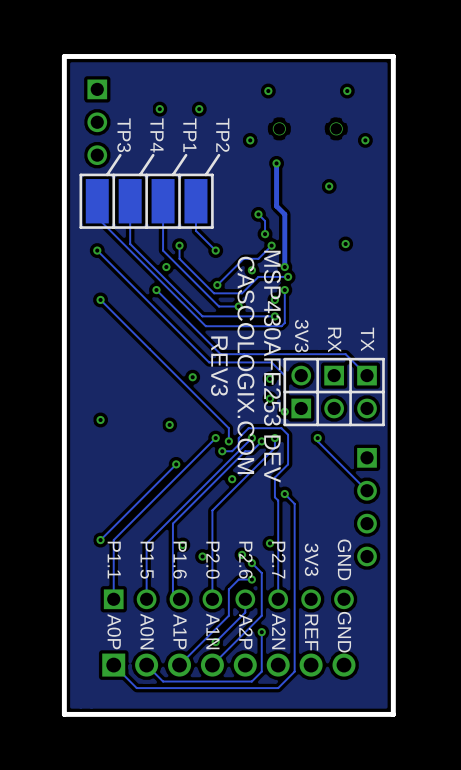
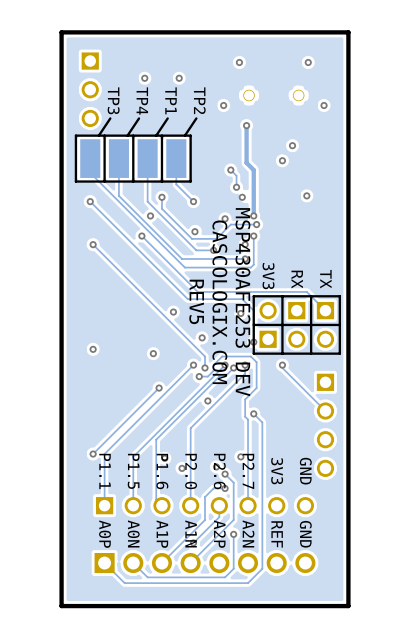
via: none -> (282, 160)
track: (271, 245) (258, 258) (243, 258) (218, 284) -> none
text: REV3 (219, 366) -> REV5 (196, 301)
via position: (269, 398) -> (202, 337)

